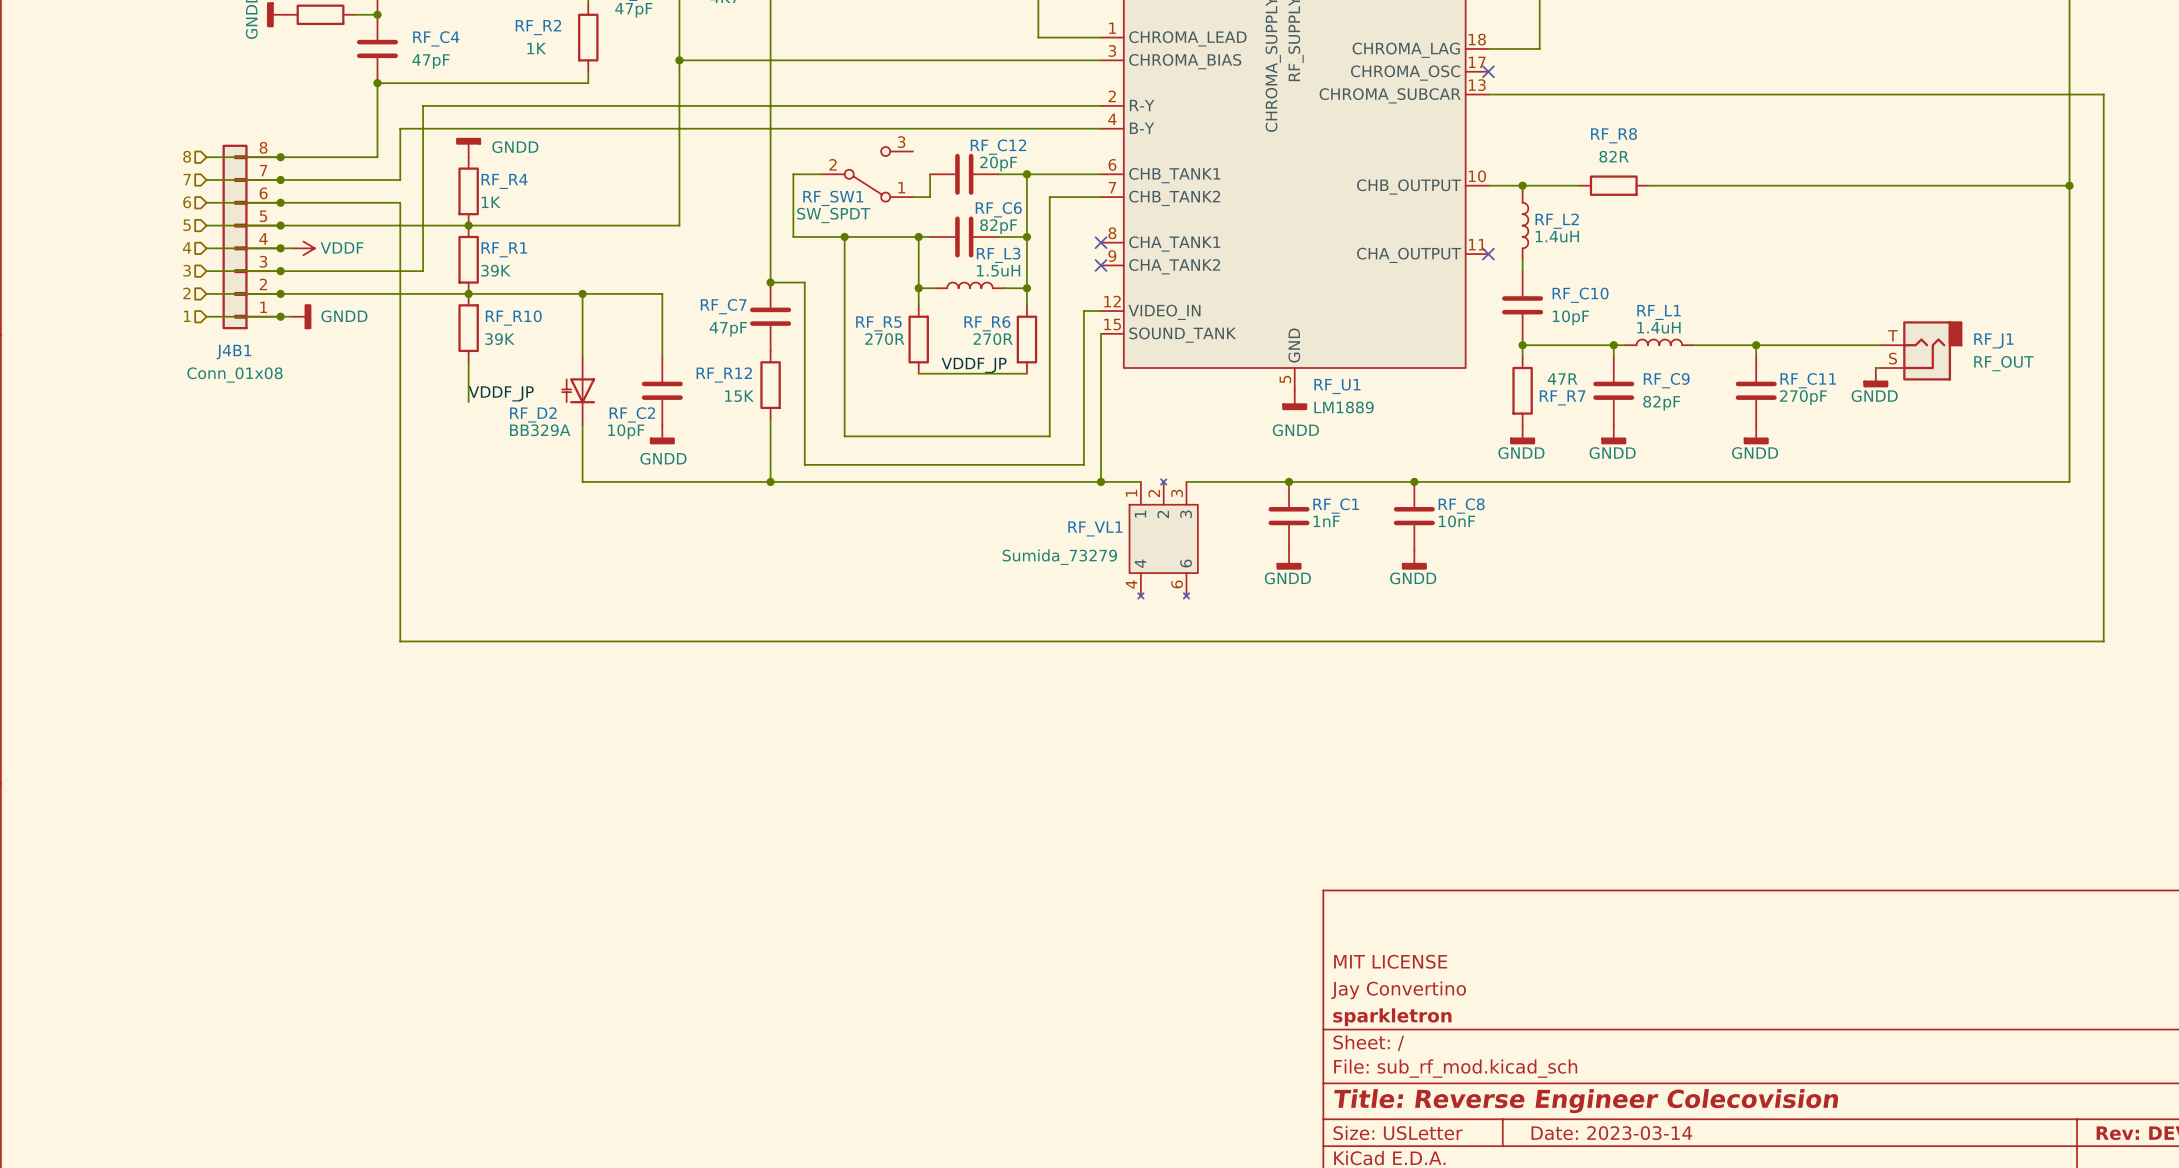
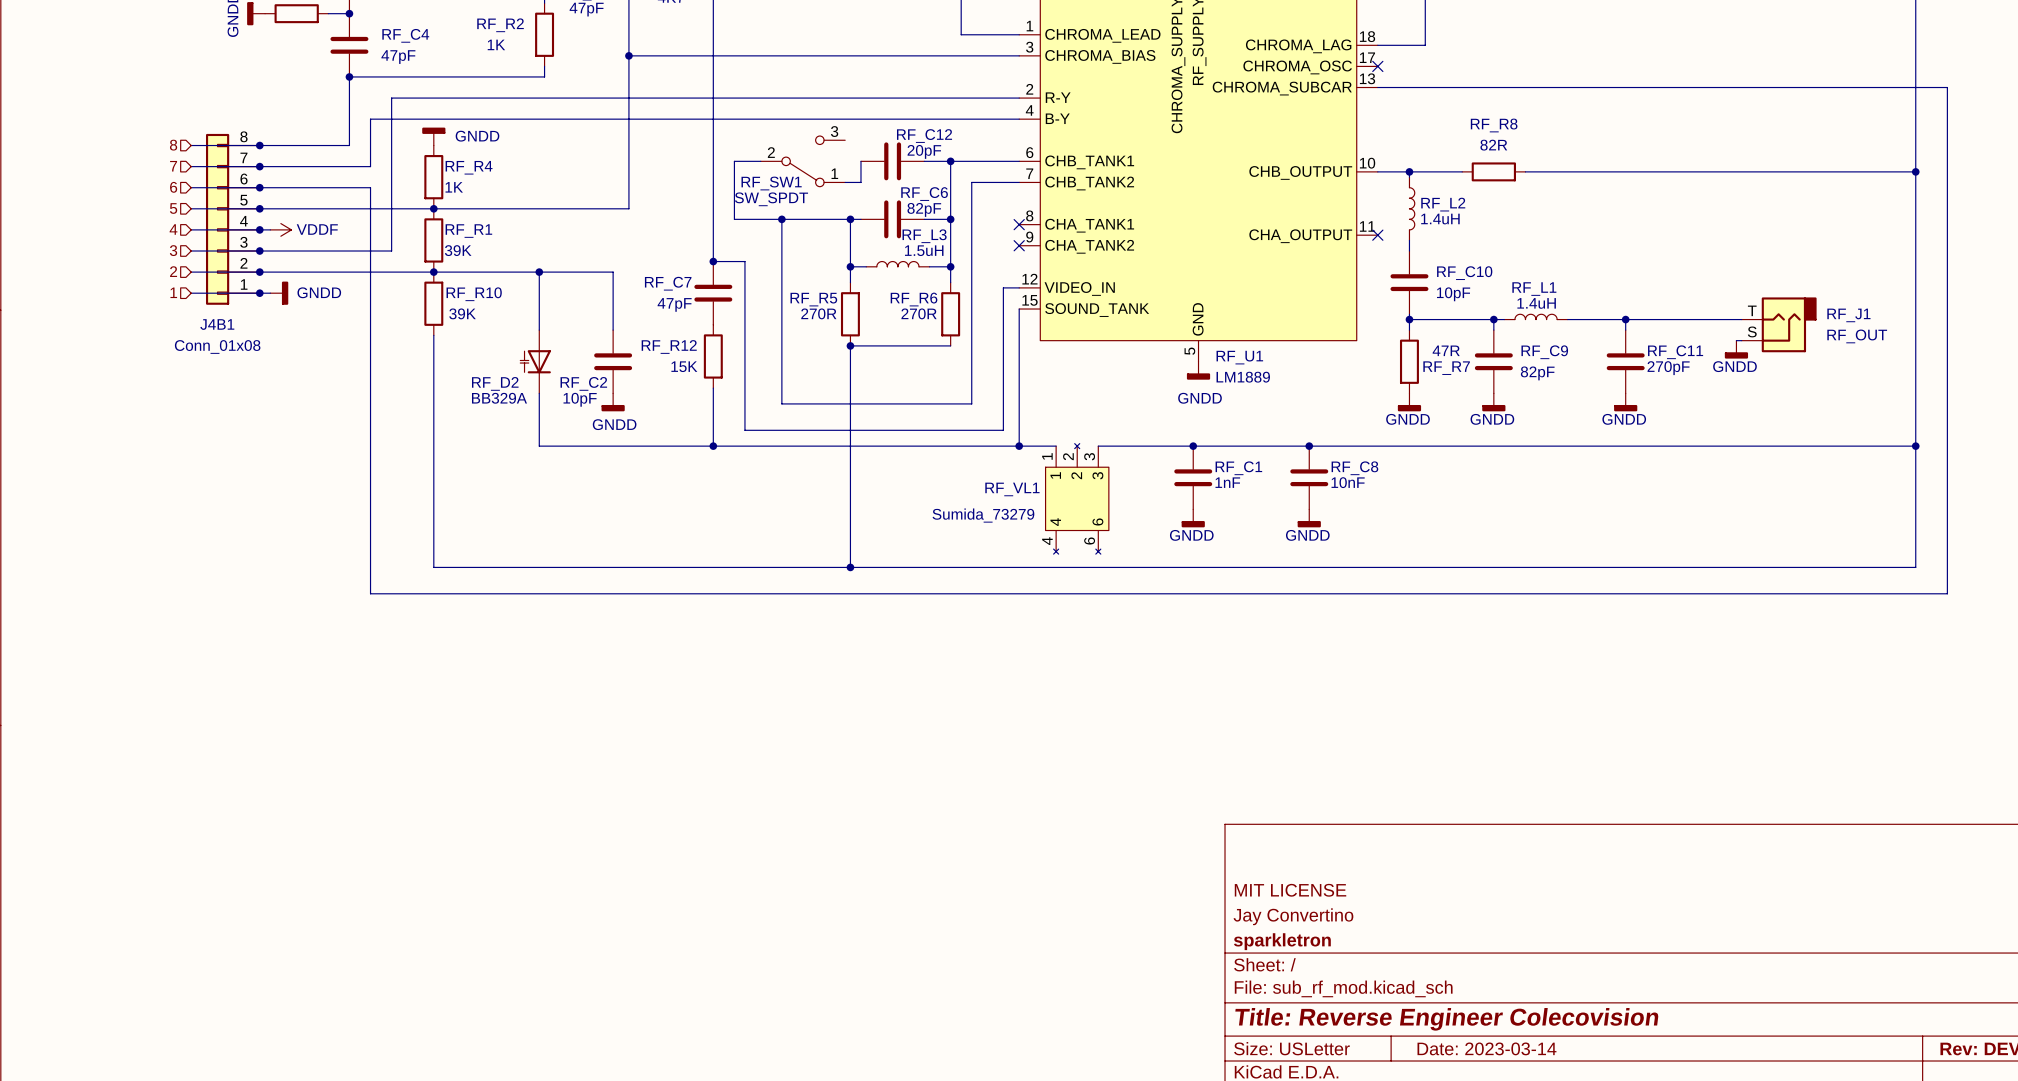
label: VDDF_JP (974, 365) -> none
wire: none -> (850, 345) (850, 567)
junction: none -> (850, 345)
label: VDDF_JP (501, 393) -> none
wire: none -> (433, 372) (433, 567) (1915, 567) (1915, 446)
junction: none -> (1915, 446)
junction: none -> (850, 567)

